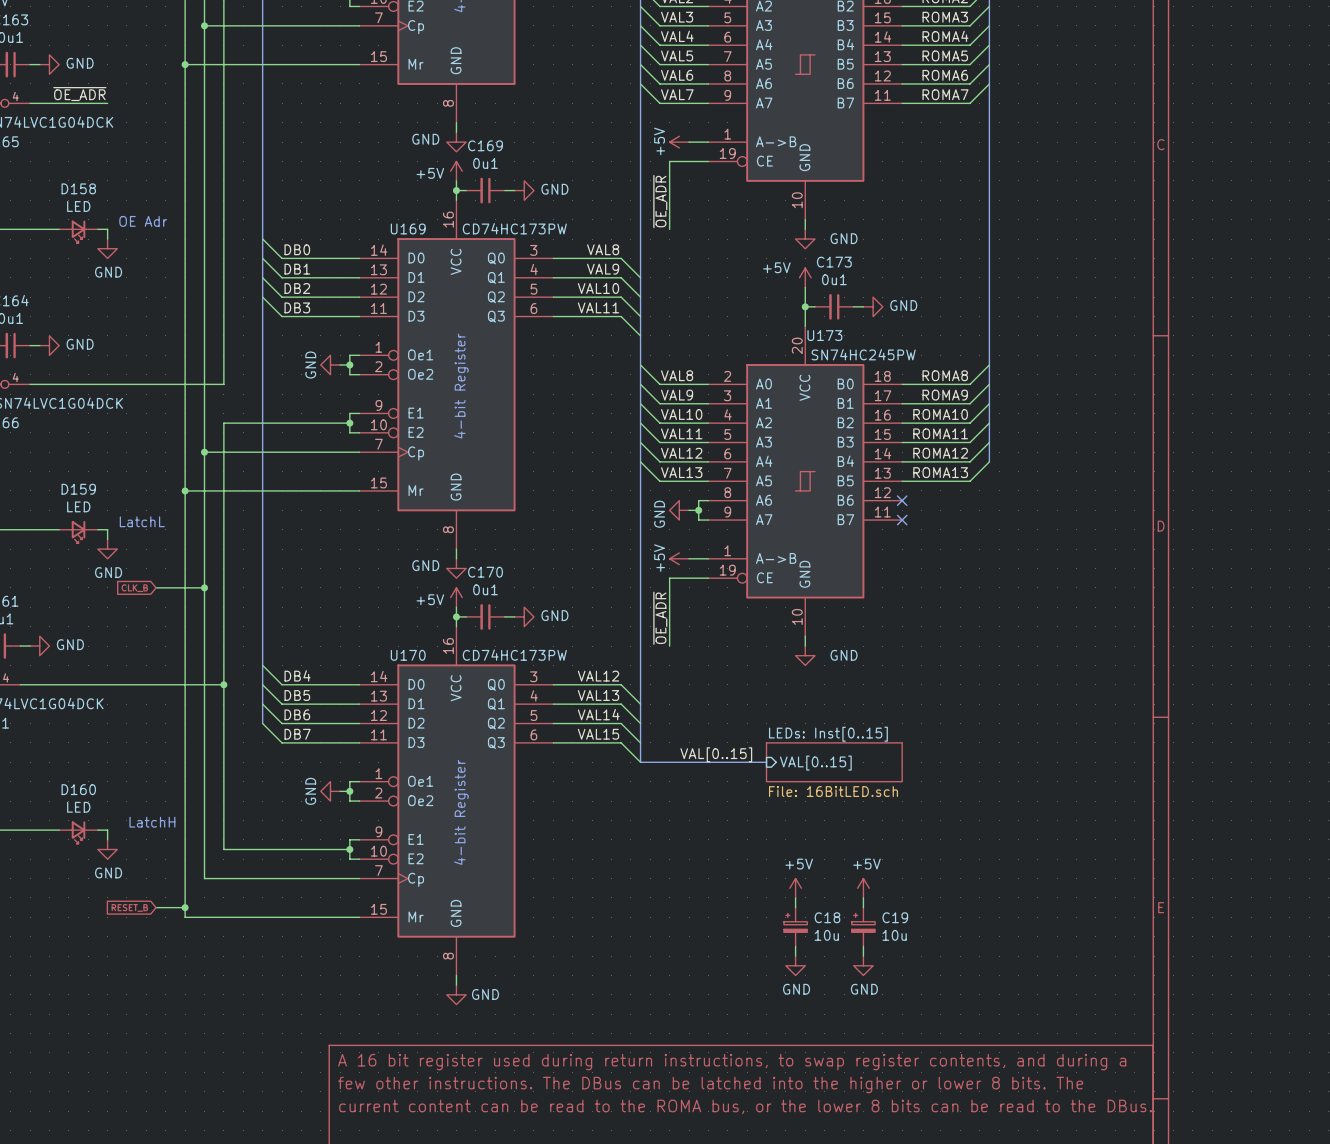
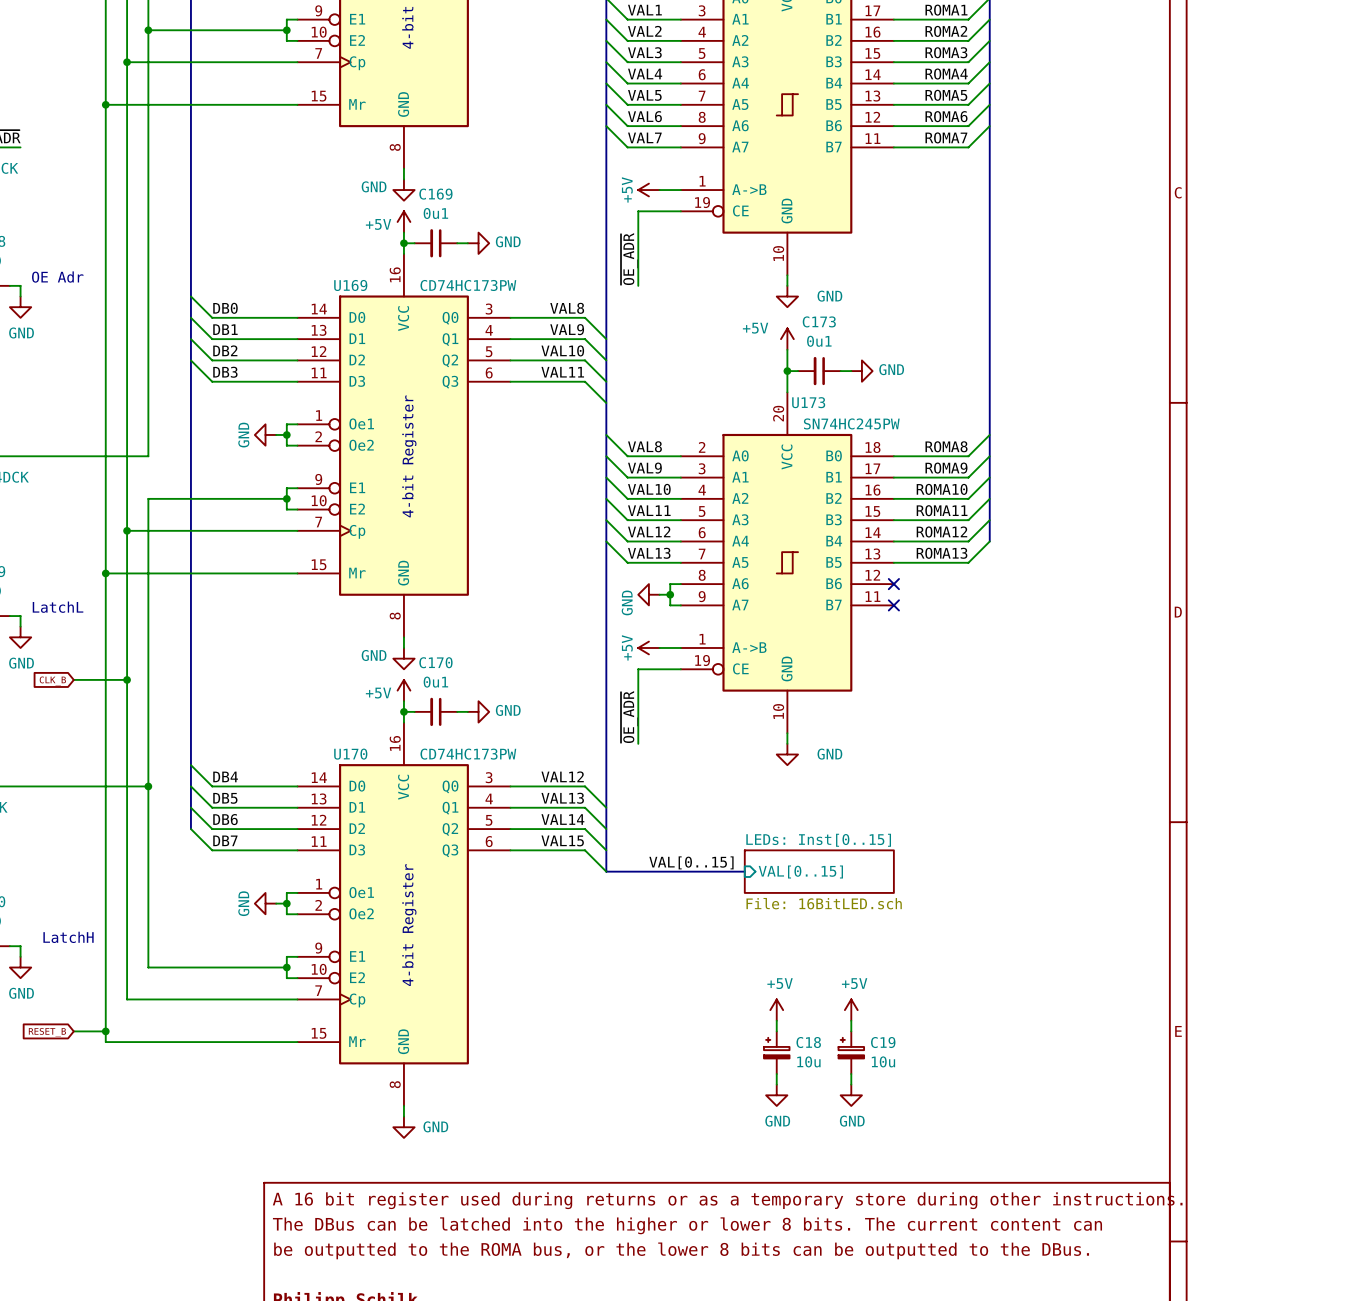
title block: A 16 bit register used during return instructions, to swap register contents, and during a (732, 1062) -> A 16 bit register used during returns or as a temporary store during other instructions. (727, 1200)
title block: few other instructions. The DBus can be latched into the higher or lower 8 bits. The (710, 1085) -> The DBus can be latched into the higher or lower 8 bits. The current content can (687, 1225)
title block: current content can be read to the ROMA bus, or the lower 8 bits can be read to the DBus. (745, 1106) -> be outputted to the ROMA bus, or the lower 8 bits can be outputted to the DBus. (681, 1250)

